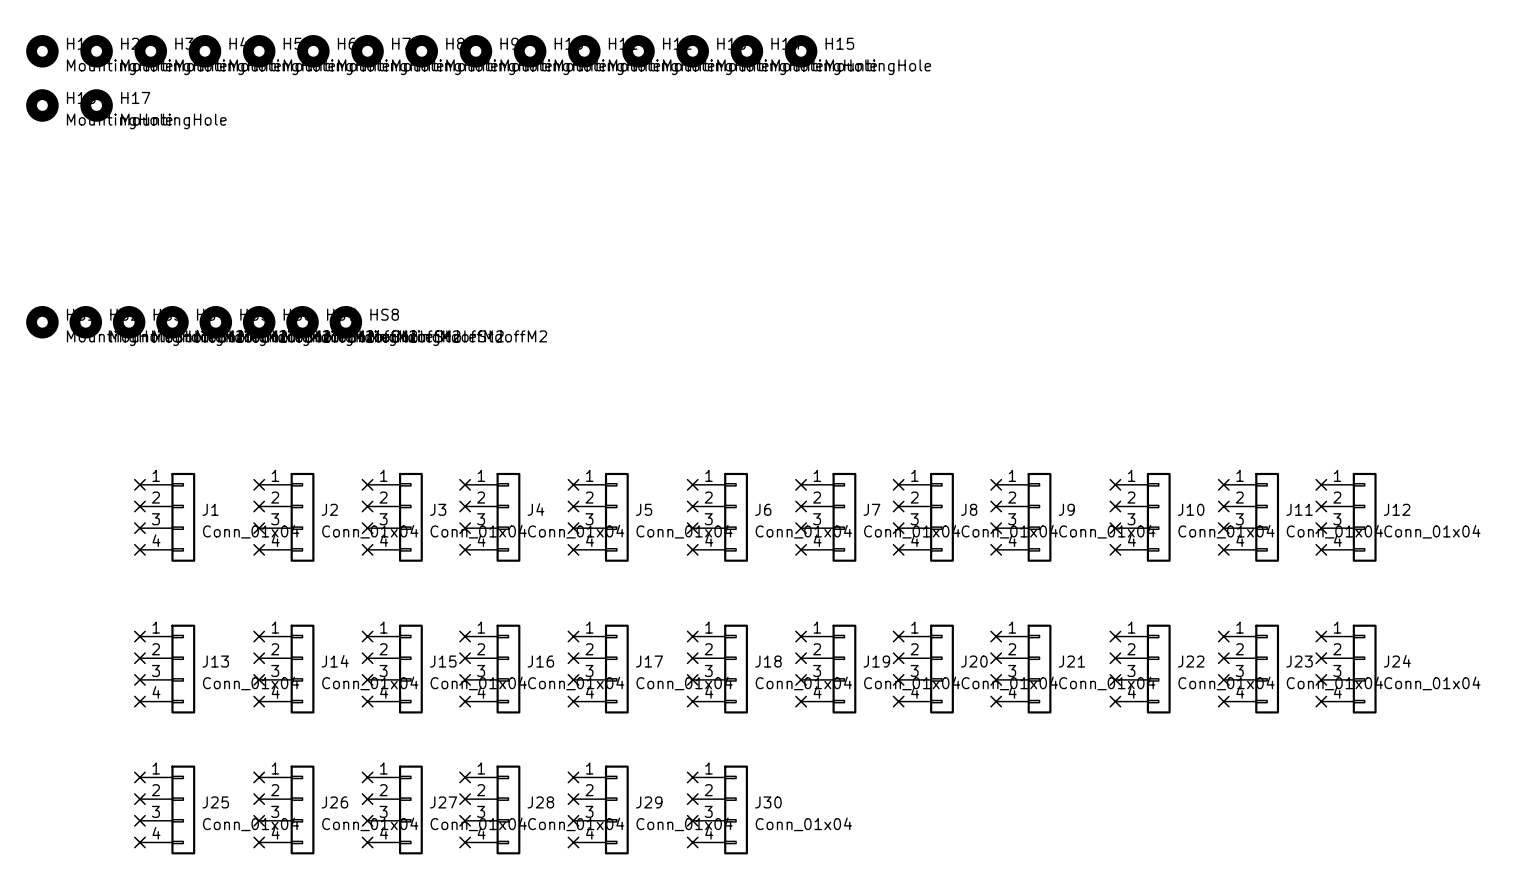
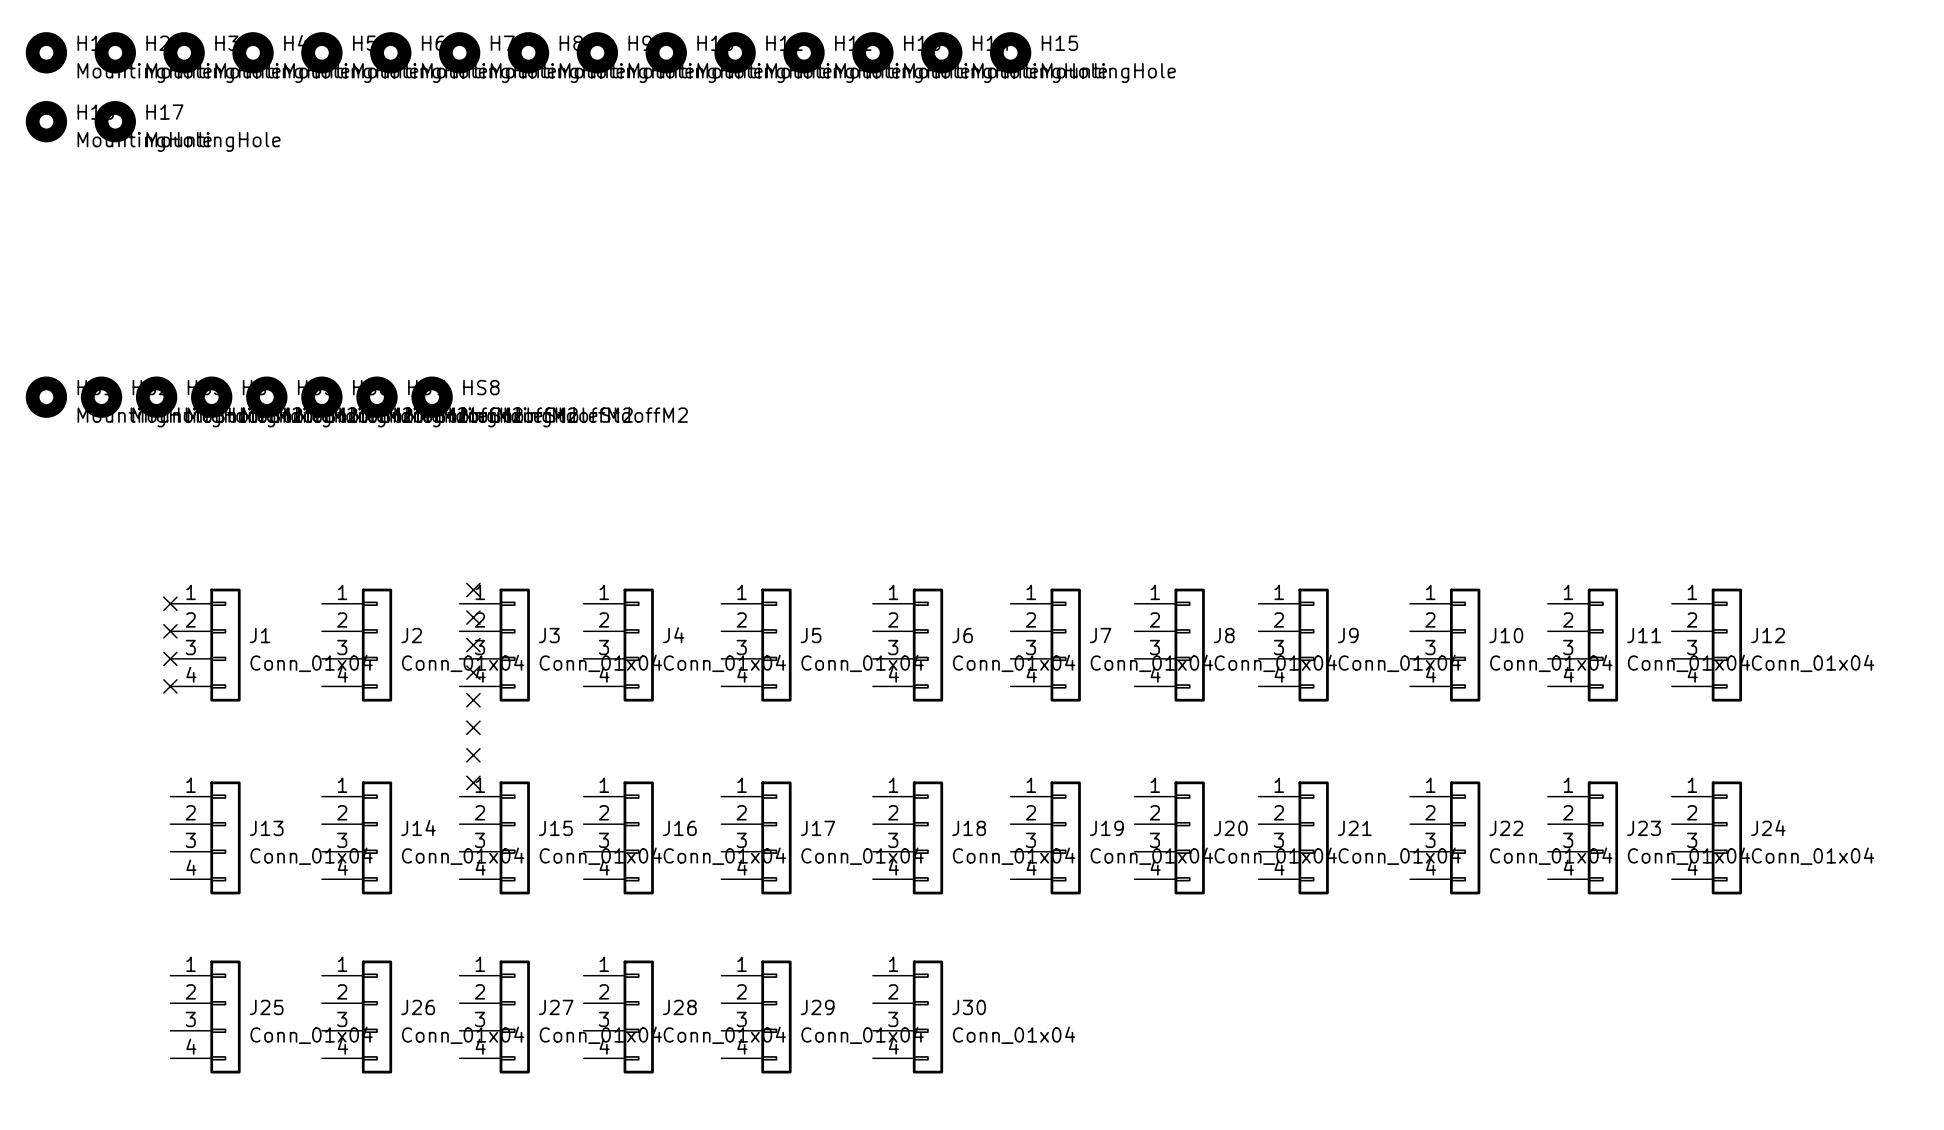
no-connect mark: none -> (473, 590)
no-connect mark: (259, 484) -> none
no-connect mark: (367, 484) -> none
no-connect mark: (465, 484) -> none
no-connect mark: (573, 484) -> none
no-connect mark: (692, 484) -> none
no-connect mark: (801, 484) -> none
no-connect mark: (898, 484) -> none
no-connect mark: (996, 484) -> none
no-connect mark: (1115, 484) -> none
no-connect mark: (1223, 484) -> none
no-connect mark: (1321, 484) -> none
no-connect mark: none -> (473, 617)
no-connect mark: (259, 506) -> none
no-connect mark: (367, 506) -> none
no-connect mark: (465, 506) -> none
no-connect mark: (573, 506) -> none
no-connect mark: (692, 506) -> none
no-connect mark: (801, 506) -> none
no-connect mark: (898, 506) -> none
no-connect mark: (996, 506) -> none
no-connect mark: (1115, 506) -> none
no-connect mark: (1223, 506) -> none
no-connect mark: (1321, 506) -> none
no-connect mark: none -> (473, 645)
no-connect mark: (259, 528) -> none
no-connect mark: (367, 528) -> none
no-connect mark: (465, 528) -> none
no-connect mark: (573, 528) -> none
no-connect mark: (692, 528) -> none
no-connect mark: (801, 528) -> none
no-connect mark: (898, 528) -> none
no-connect mark: (996, 528) -> none
no-connect mark: (1115, 528) -> none
no-connect mark: (1223, 528) -> none
no-connect mark: (1321, 528) -> none
no-connect mark: none -> (473, 672)
no-connect mark: (259, 549) -> none
no-connect mark: (367, 549) -> none
no-connect mark: (465, 549) -> none
no-connect mark: (573, 549) -> none
no-connect mark: (692, 549) -> none
no-connect mark: (801, 549) -> none
no-connect mark: (898, 549) -> none
no-connect mark: (996, 549) -> none
no-connect mark: (1115, 549) -> none
no-connect mark: (1223, 549) -> none
no-connect mark: (1321, 549) -> none
no-connect mark: none -> (473, 700)
no-connect mark: none -> (473, 727)
no-connect mark: none -> (473, 755)
no-connect mark: (139, 636) -> none
no-connect mark: (259, 636) -> none
no-connect mark position: (367, 636) -> (473, 782)
no-connect mark: (465, 636) -> none
no-connect mark: (573, 636) -> none
no-connect mark: (692, 636) -> none
no-connect mark: (801, 636) -> none
no-connect mark: (898, 636) -> none
no-connect mark: (996, 636) -> none
no-connect mark: (1115, 636) -> none
no-connect mark: (1223, 636) -> none
no-connect mark: (1321, 636) -> none
no-connect mark: (139, 658) -> none
no-connect mark: (259, 658) -> none
no-connect mark: (367, 658) -> none
no-connect mark: (465, 658) -> none
no-connect mark: (573, 658) -> none
no-connect mark: (692, 658) -> none
no-connect mark: (801, 658) -> none
no-connect mark: (898, 658) -> none
no-connect mark: (996, 658) -> none
no-connect mark: (1115, 658) -> none
no-connect mark: (1223, 658) -> none
no-connect mark: (1321, 658) -> none
no-connect mark: (139, 679) -> none
no-connect mark: (259, 679) -> none
no-connect mark: (367, 679) -> none
no-connect mark: (465, 679) -> none
no-connect mark: (573, 679) -> none
no-connect mark: (692, 679) -> none
no-connect mark: (801, 679) -> none
no-connect mark: (898, 679) -> none
no-connect mark: (996, 679) -> none
no-connect mark: (1115, 679) -> none
no-connect mark: (1223, 679) -> none
no-connect mark: (1321, 679) -> none
no-connect mark: (139, 701) -> none
no-connect mark: (259, 701) -> none
no-connect mark: (367, 701) -> none
no-connect mark: (465, 701) -> none
no-connect mark: (573, 701) -> none
no-connect mark: (692, 701) -> none
no-connect mark: (801, 701) -> none
no-connect mark: (898, 701) -> none
no-connect mark: (996, 701) -> none
no-connect mark: (1115, 701) -> none
no-connect mark: (1223, 701) -> none
no-connect mark: (1321, 701) -> none
no-connect mark: (139, 777) -> none
no-connect mark: (259, 777) -> none
no-connect mark: (367, 777) -> none
no-connect mark: (465, 777) -> none
no-connect mark: (573, 777) -> none
no-connect mark: (692, 777) -> none
no-connect mark: (139, 799) -> none
no-connect mark: (259, 799) -> none
no-connect mark: (367, 799) -> none
no-connect mark: (465, 799) -> none
no-connect mark: (573, 799) -> none
no-connect mark: (692, 799) -> none
no-connect mark: (139, 820) -> none
no-connect mark: (259, 820) -> none
no-connect mark: (367, 820) -> none
no-connect mark: (465, 820) -> none
no-connect mark: (573, 820) -> none
no-connect mark: (692, 820) -> none
no-connect mark: (139, 842) -> none
no-connect mark: (259, 842) -> none
no-connect mark: (367, 842) -> none
no-connect mark: (465, 842) -> none
no-connect mark: (573, 842) -> none
no-connect mark: (692, 842) -> none

